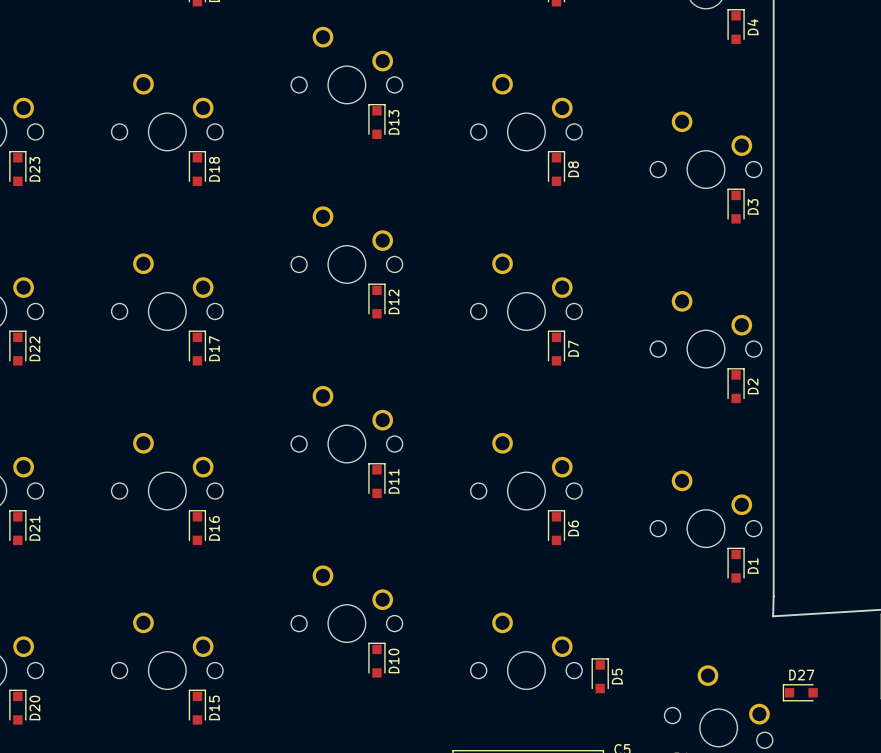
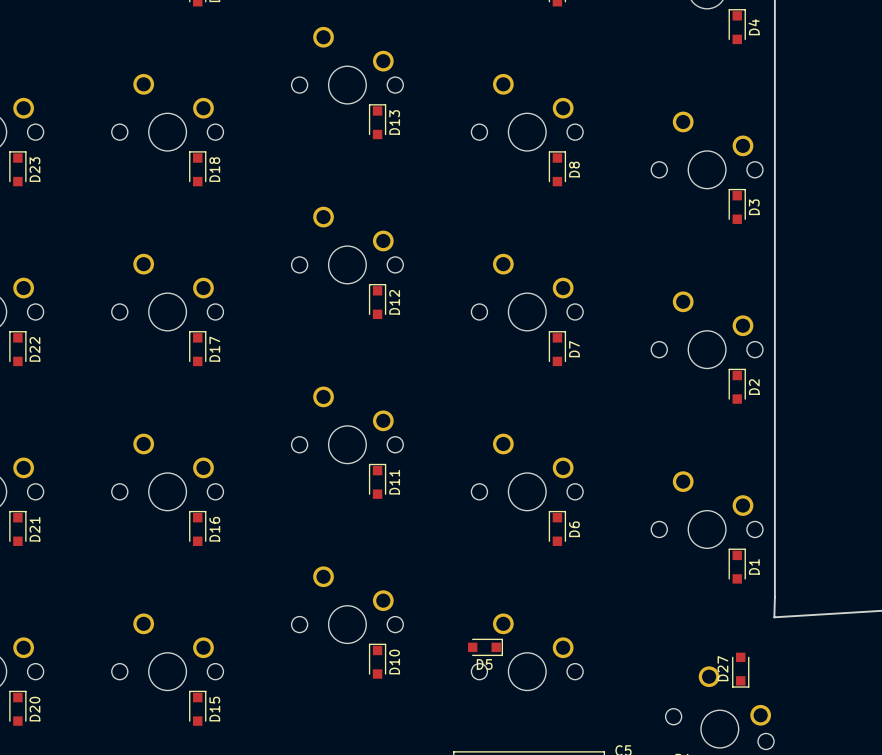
D5 rotation: 0° (600, 675) -> 90° clockwise (485, 647)
D5 position: (600, 675) -> (485, 647)
D27 rotation: 0° (800, 692) -> 90° counterclockwise (740, 670)
D27 position: (800, 692) -> (740, 670)

